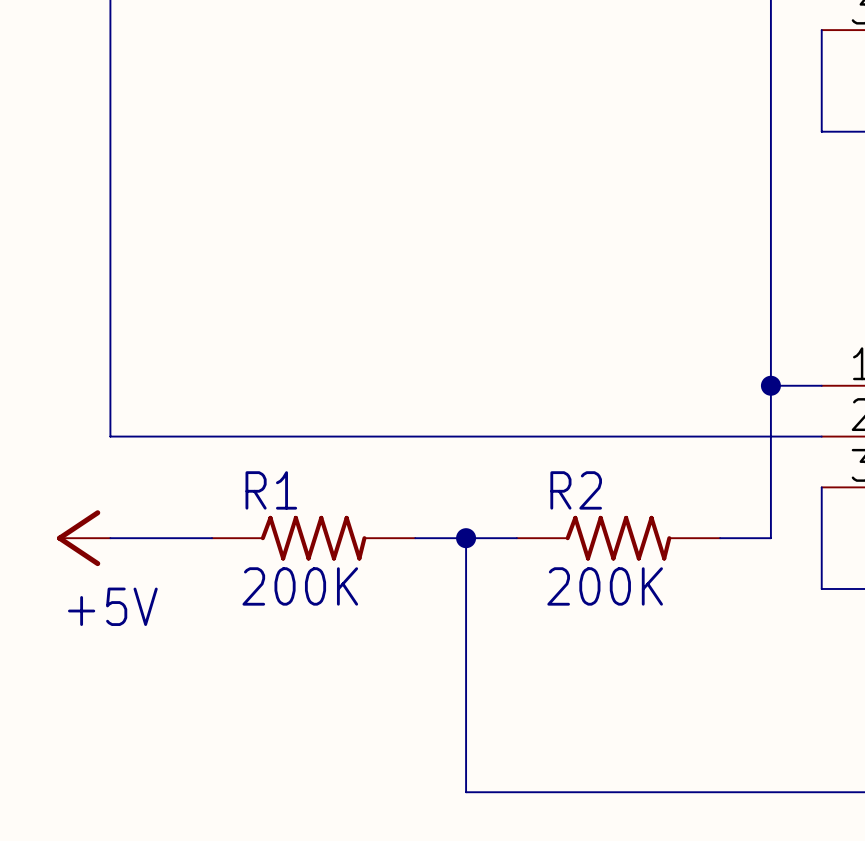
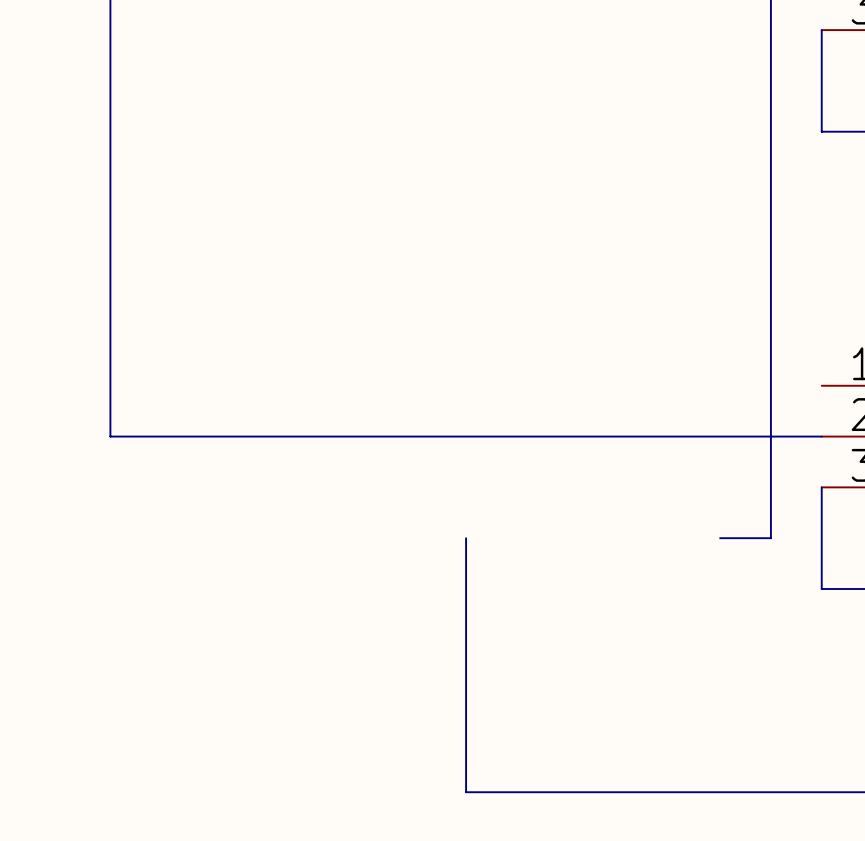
wire: (770, 385) (821, 385) -> none
junction: (770, 385) -> none
power symbol: +5V (83, 538) -> none
wire: (110, 538) (212, 538) -> none
R1: 200K (313, 538) -> none
wire: (415, 538) (516, 538) -> none
junction: (466, 538) -> none
R2: 200K (618, 538) -> none

